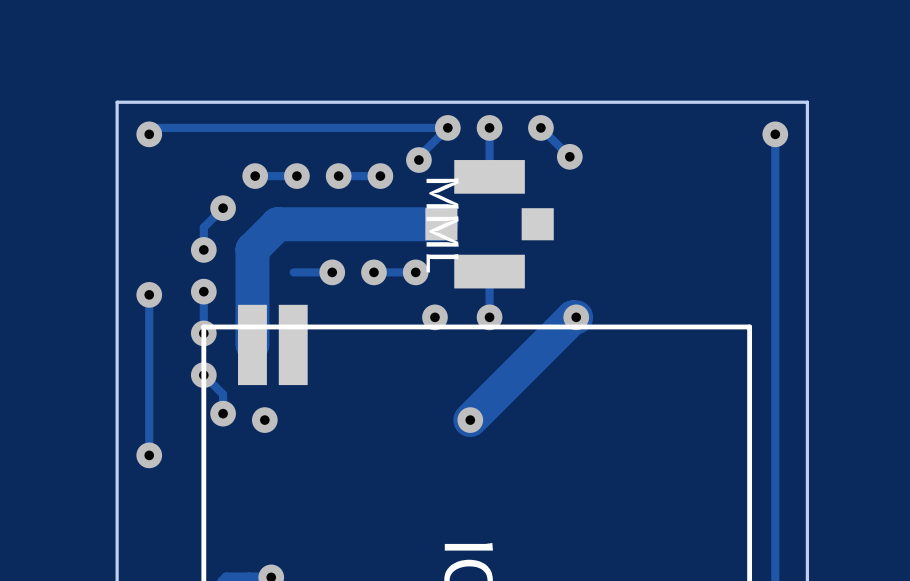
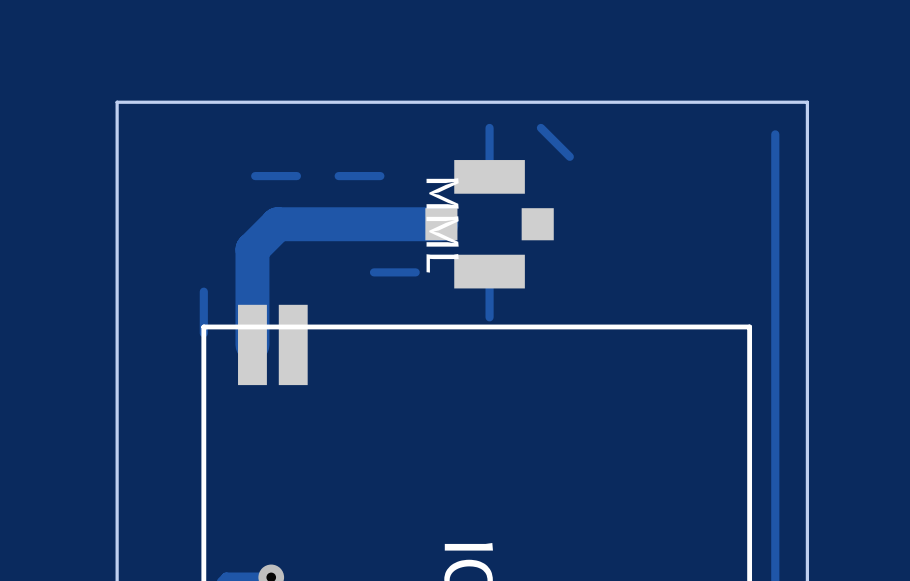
via: (447, 127) -> none
via: (489, 127) -> none
via: (540, 127) -> none
track: (149, 134) (155, 127) (447, 127) (418, 156) (418, 160) -> none
via: (149, 134) -> none
via: (775, 134) -> none
via: (569, 156) -> none
via: (418, 160) -> none
via: (255, 176) -> none
via: (296, 176) -> none
via: (338, 176) -> none
via: (380, 176) -> none
track: (223, 208) (203, 227) (203, 249) -> none
via: (223, 208) -> none
via: (203, 249) -> none
track: (332, 272) (293, 272) -> none
via: (332, 272) -> none
via: (373, 272) -> none
via: (415, 272) -> none
via: (203, 291) -> none
track: (149, 294) (149, 455) -> none
via: (149, 294) -> none
via: (434, 317) -> none
via: (489, 317) -> none
track: (576, 317) (573, 317) (470, 420) -> none
via: (576, 317) -> none
via: (203, 333) -> none
track: (203, 375) (223, 394) (223, 413) -> none
via: (203, 375) -> none
via: (223, 413) -> none
via: (264, 420) -> none
via: (470, 420) -> none
via: (149, 455) -> none

